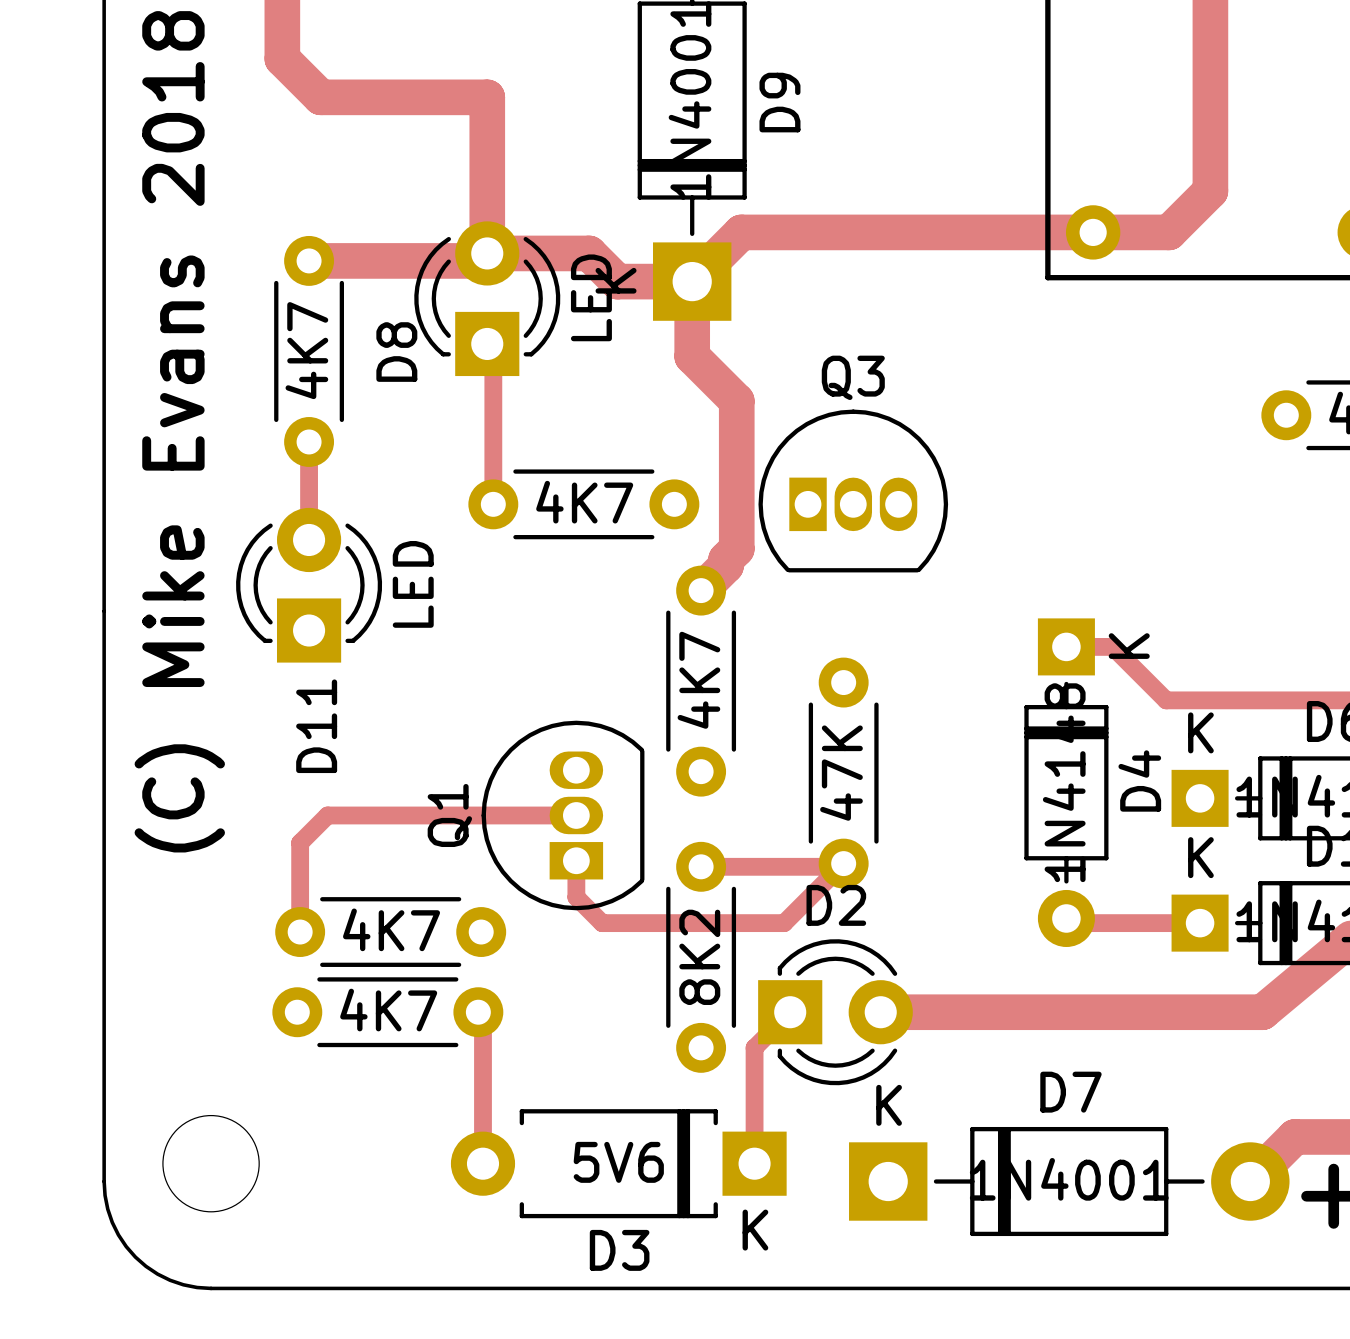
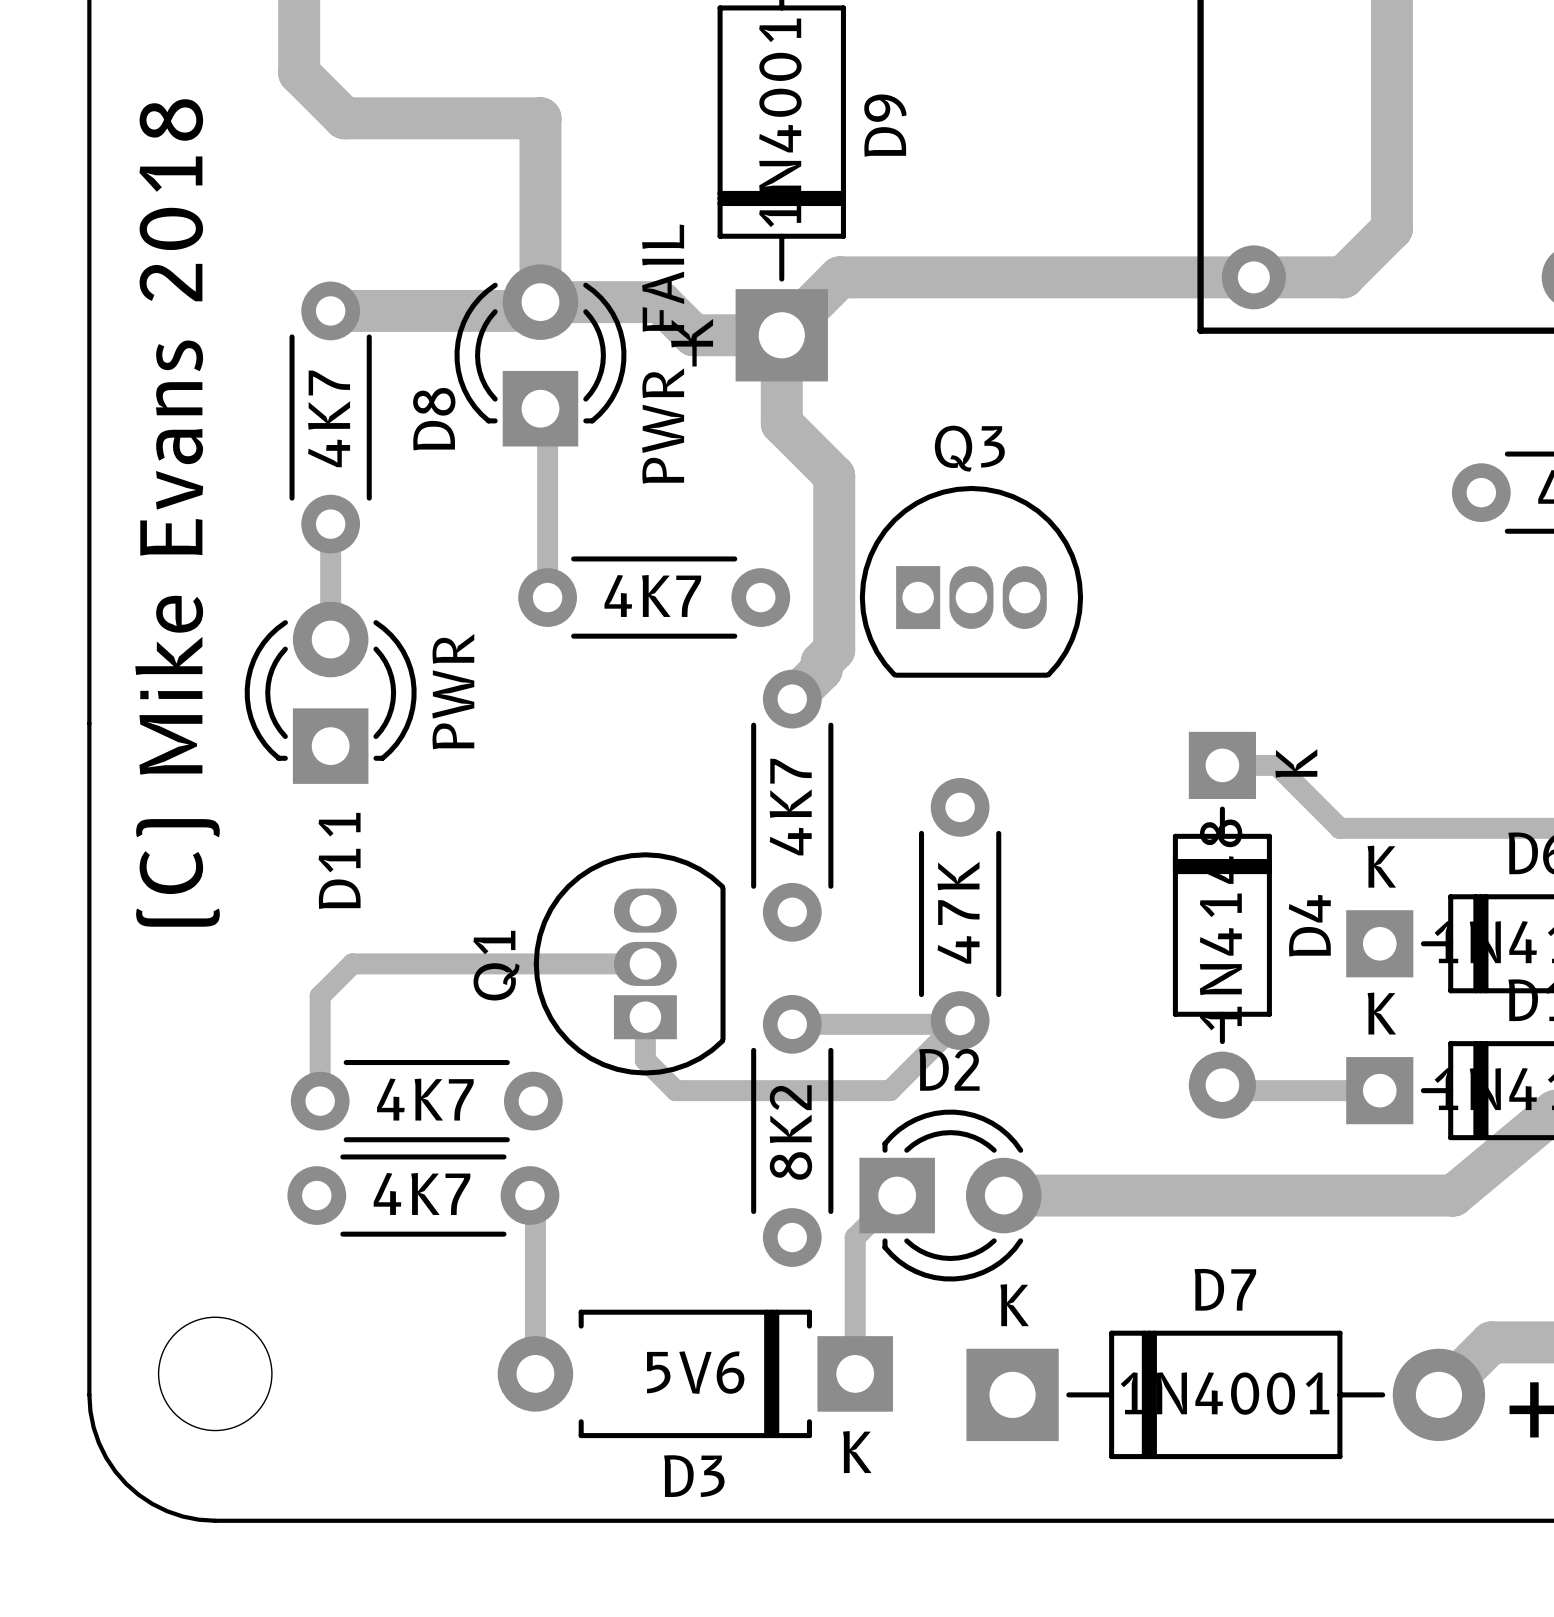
D8 value: LED (591, 297) -> PWR_FAIL (669, 354)
D11 value: LED (413, 584) -> PWR (453, 691)

